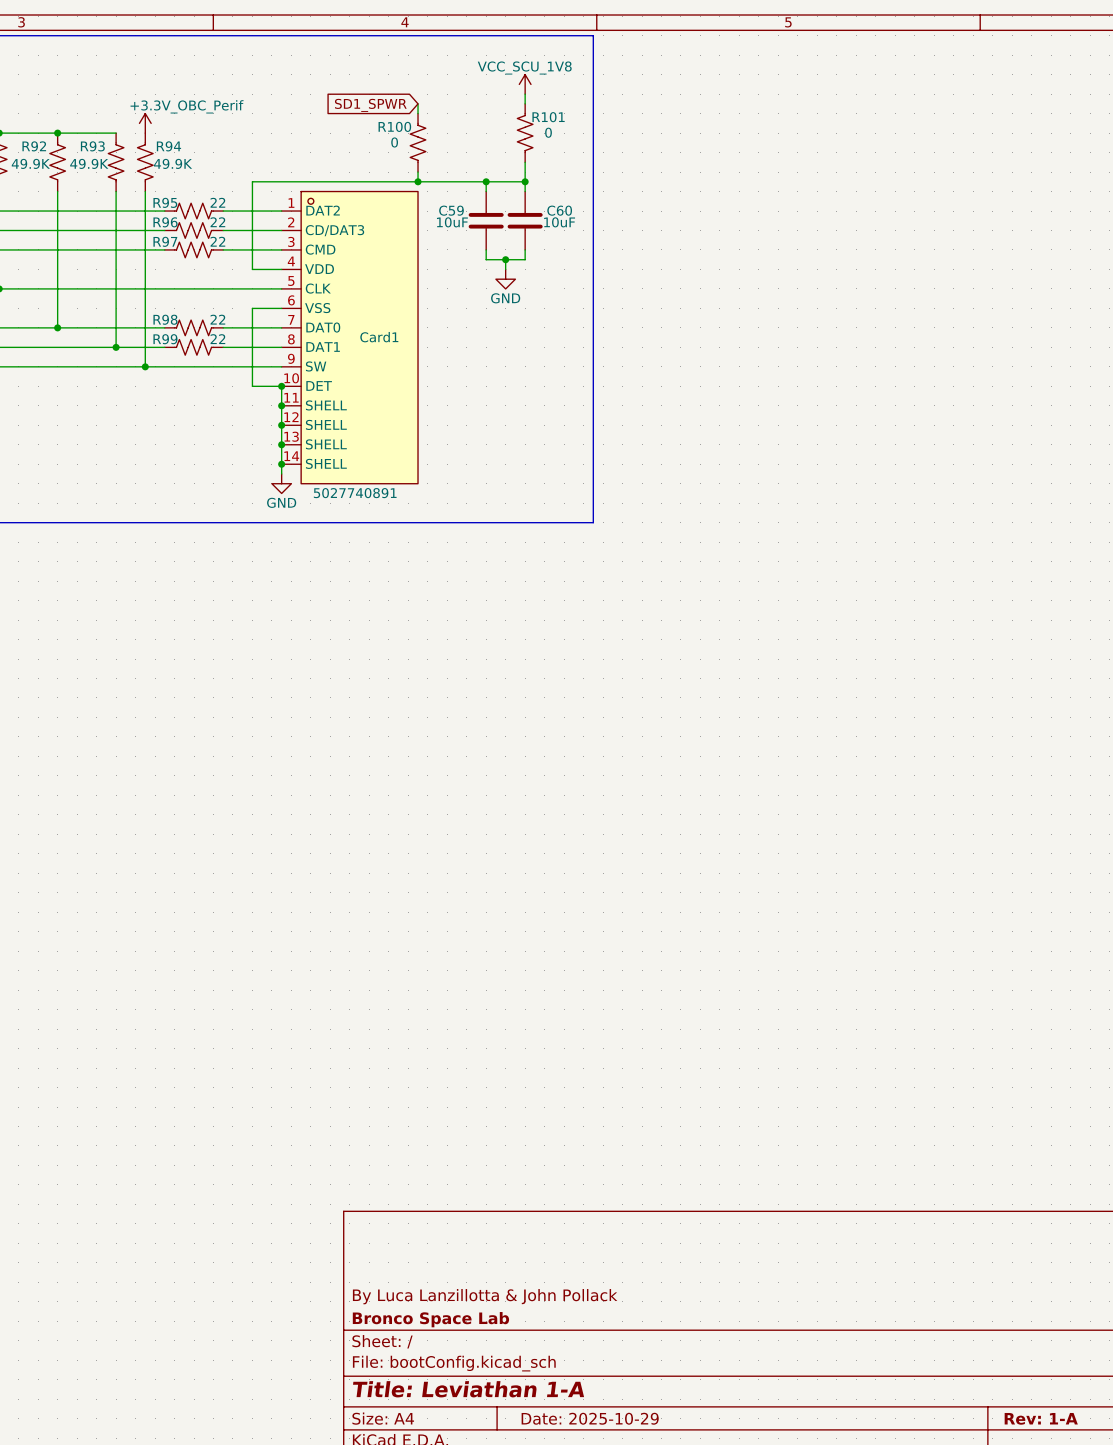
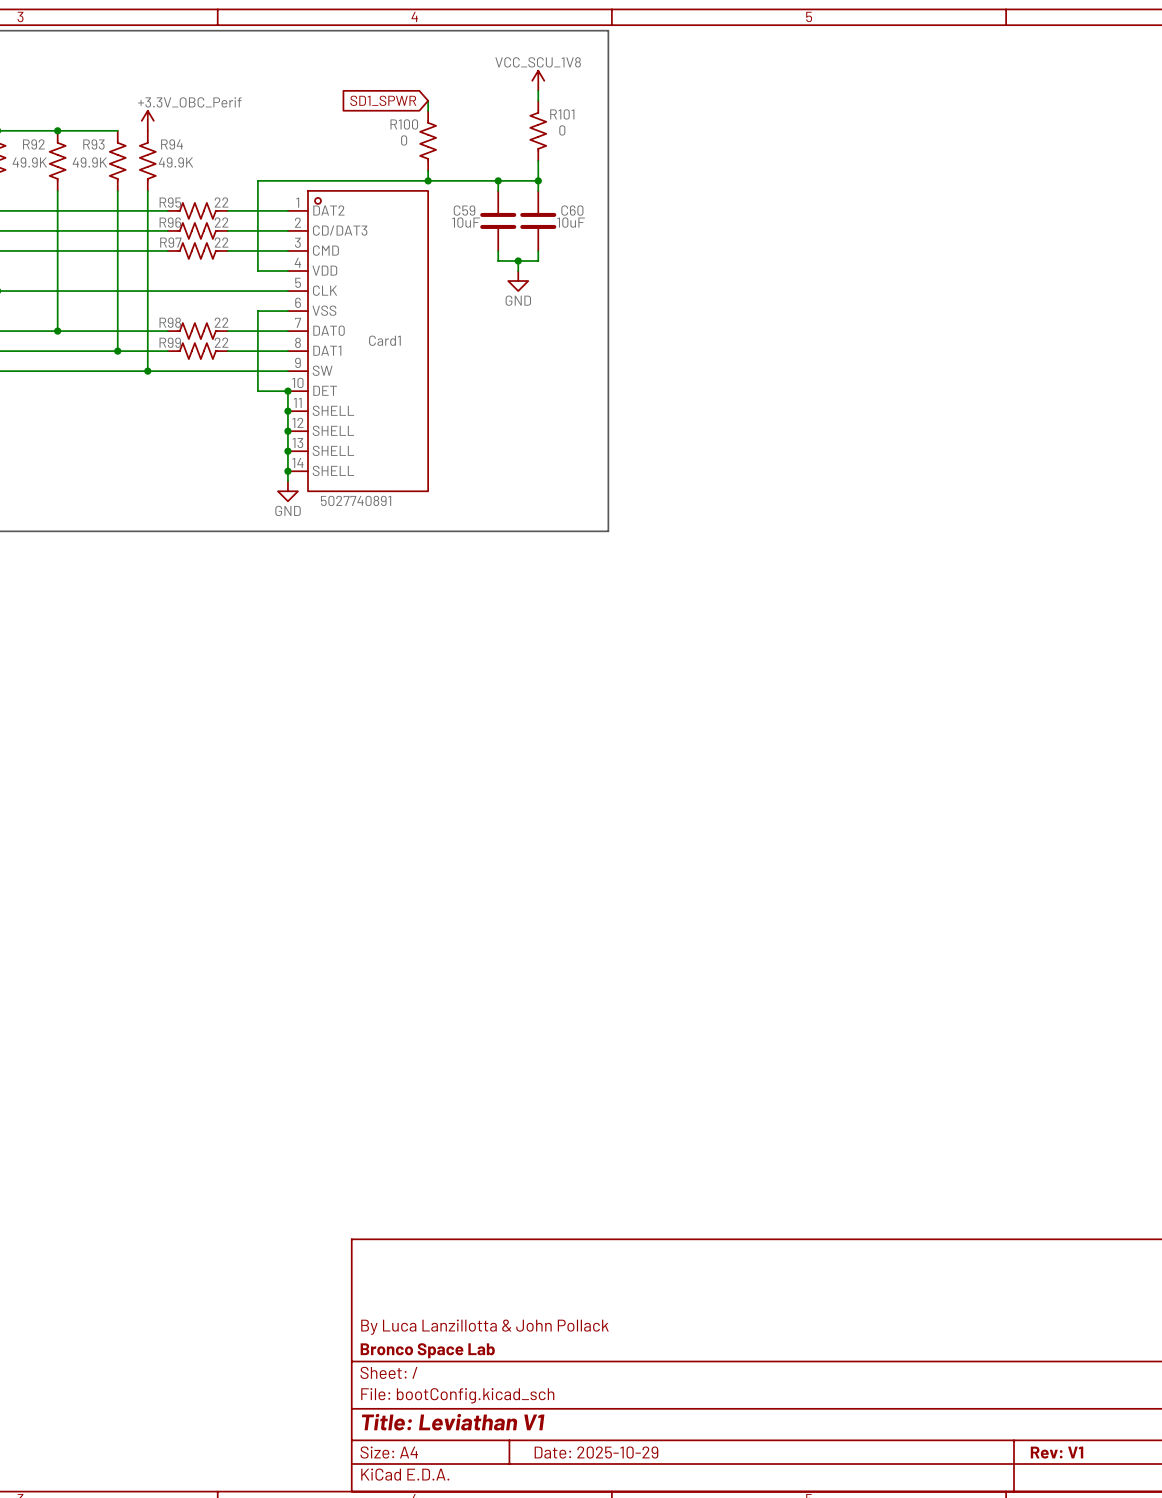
title block: Title: Leviathan 1-A (468, 1389) -> Title: Leviathan V1 (453, 1422)
title block: Rev: 1-A (1041, 1418) -> Rev: V1 (1057, 1452)

